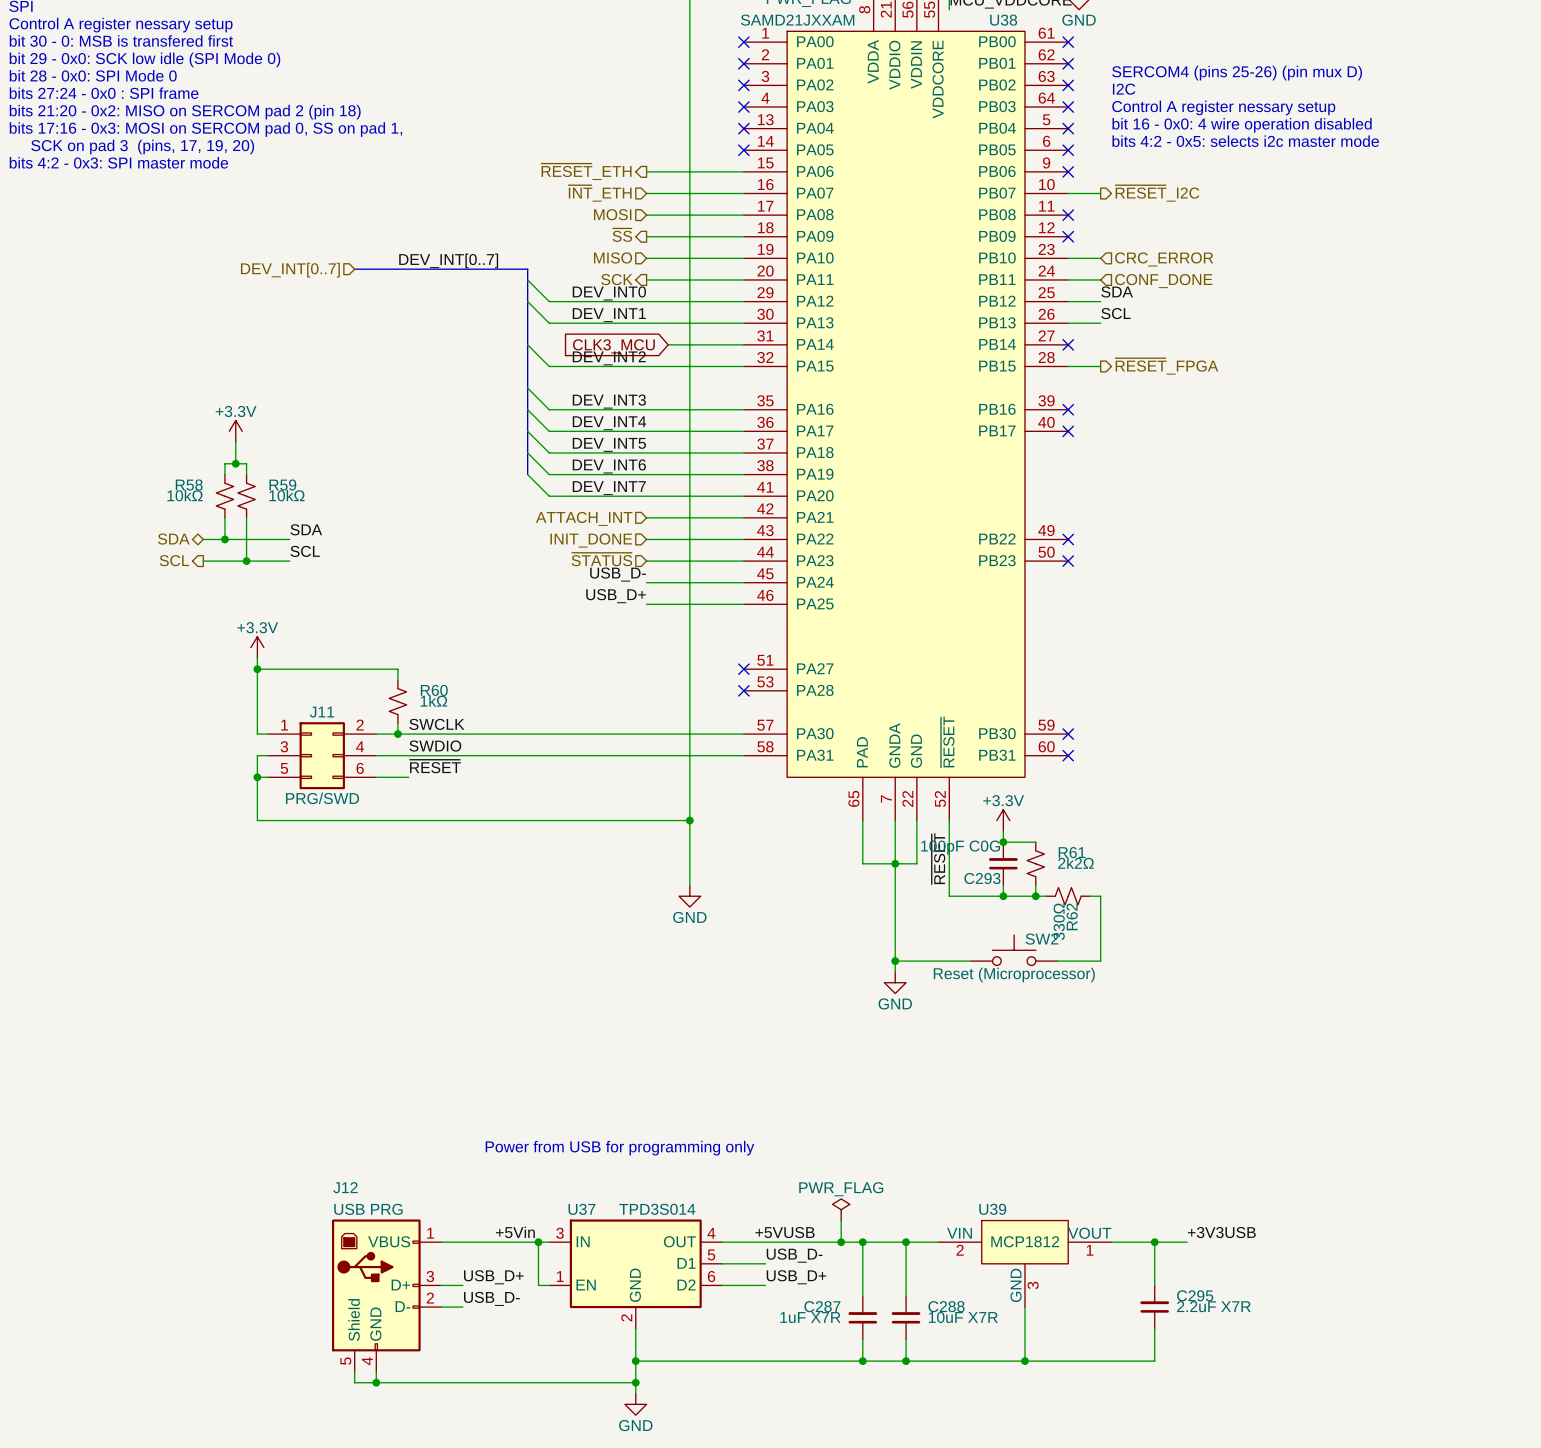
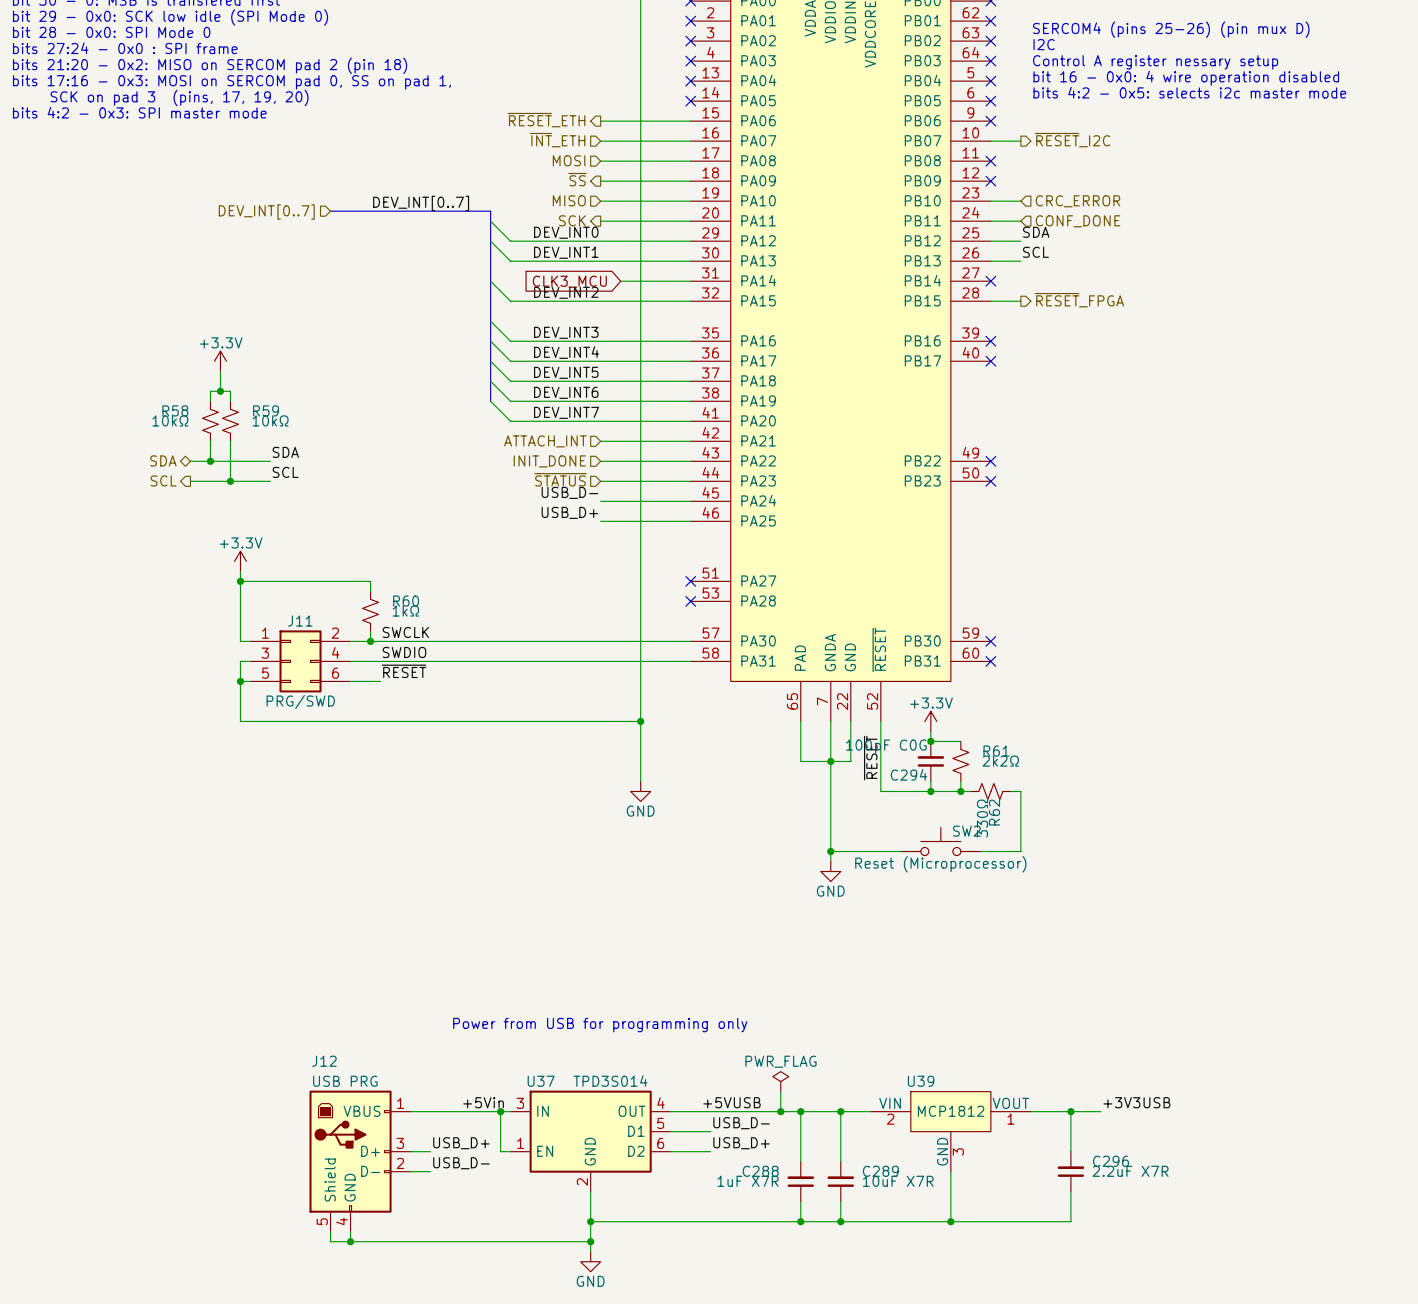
C293 name: C293 (982, 878) -> C294 (908, 774)
C295 name: C295 (1195, 1295) -> C296 (1111, 1161)
C287 name: C287 (822, 1306) -> C288 (760, 1171)
C288 name: C288 (946, 1306) -> C289 (880, 1171)

